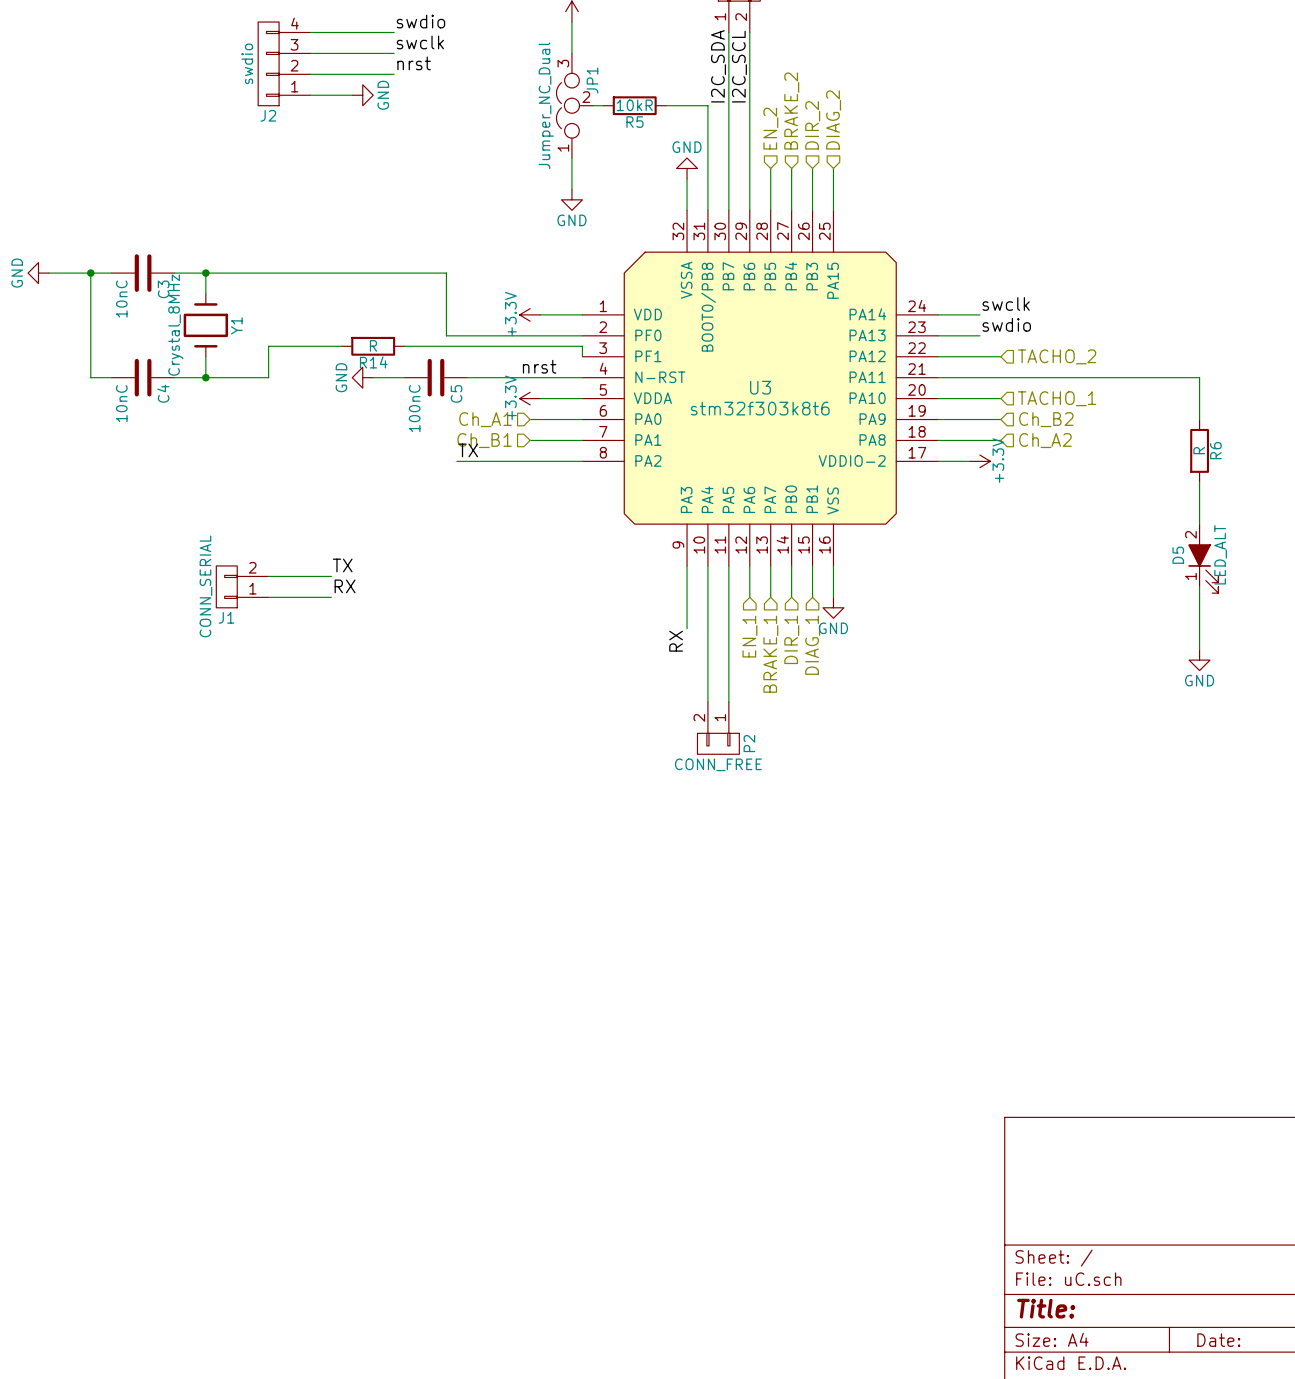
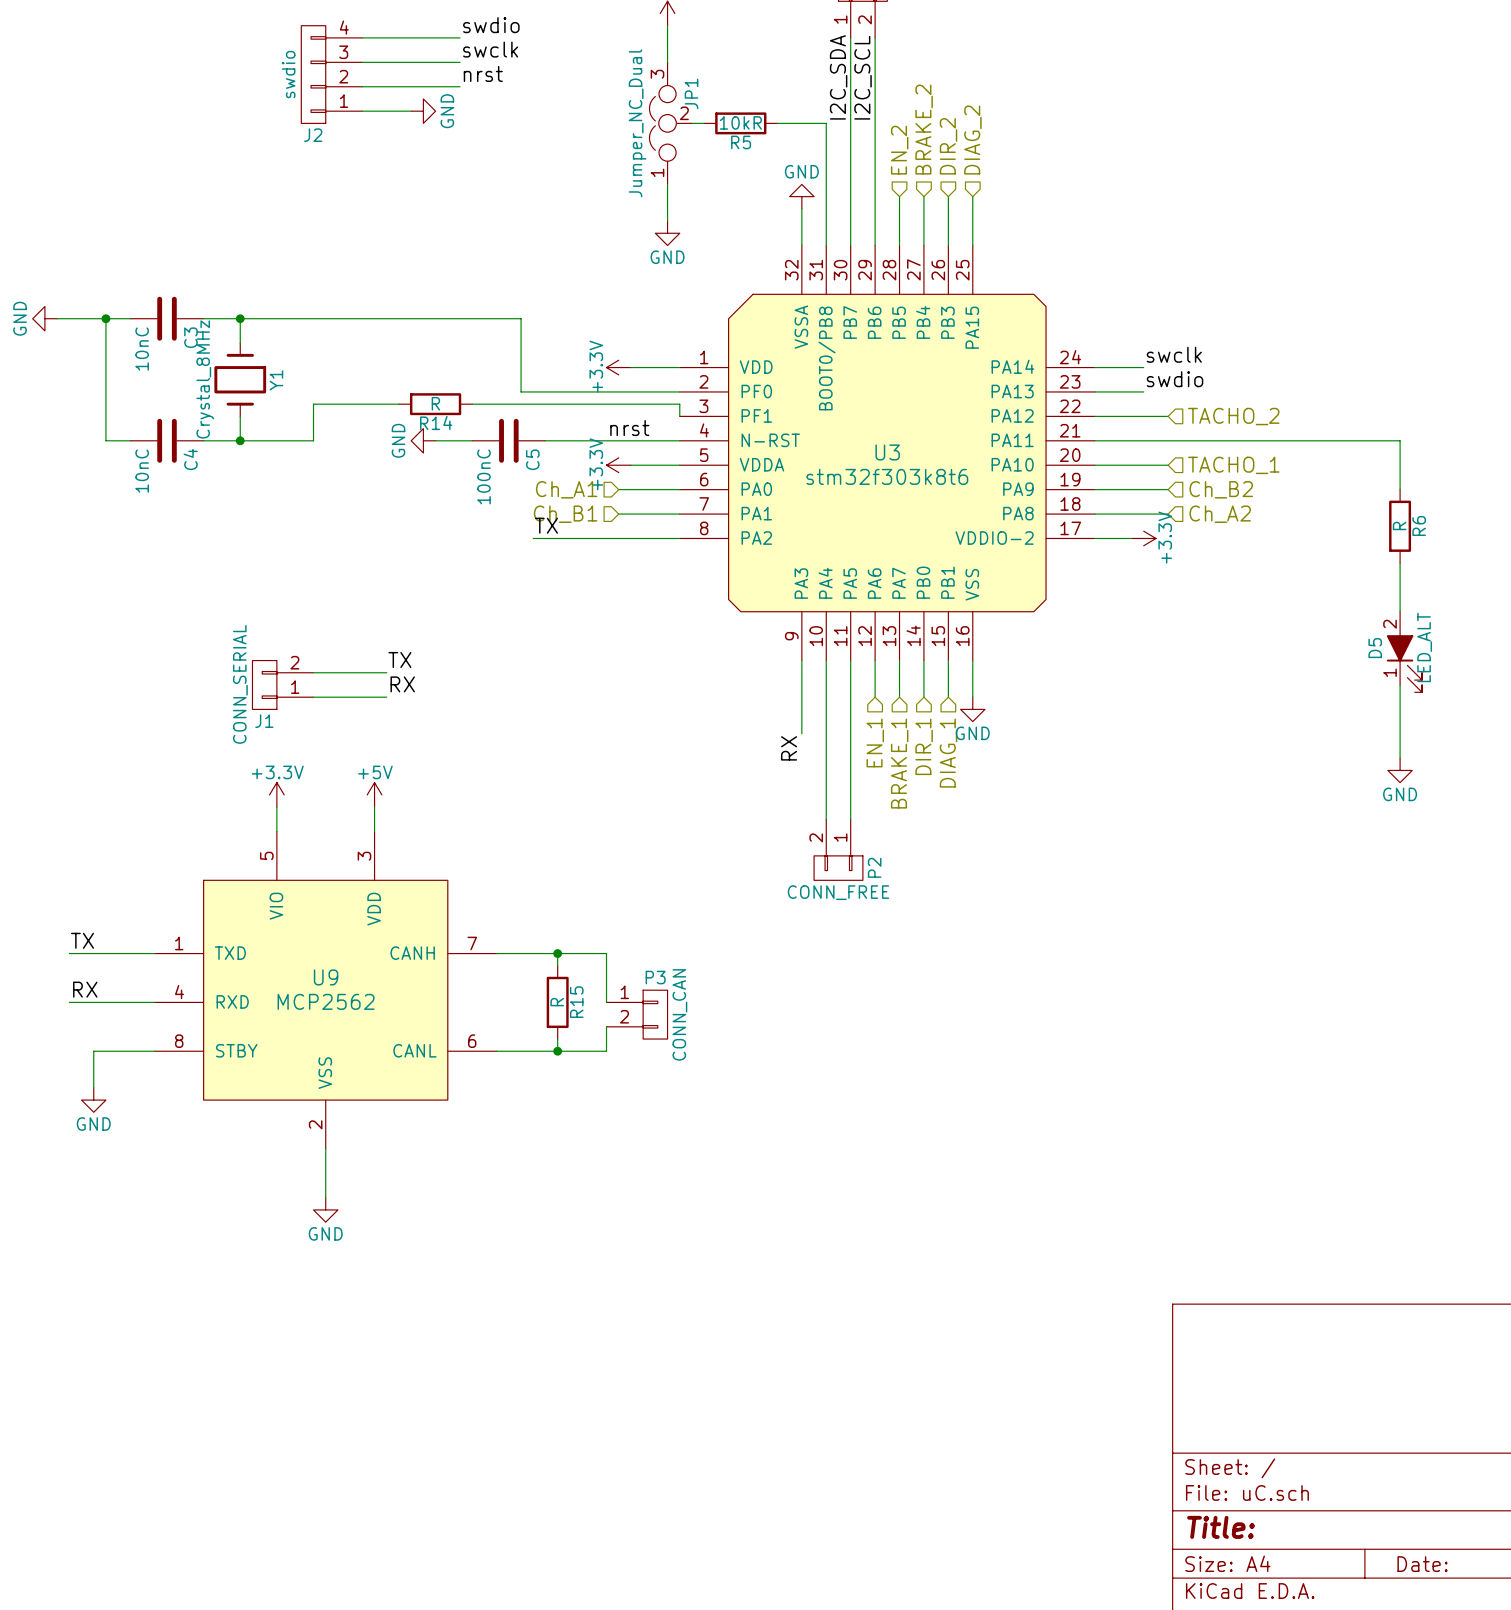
power symbol: none -> +3.3V (276, 794)
power symbol: none -> +5V (374, 794)
wire: none -> (276, 807) (276, 831)
wire: none -> (374, 807) (374, 831)
label: none -> TX (82, 940)
wire: none -> (69, 953) (154, 953)
wire: none -> (496, 953) (606, 953) (606, 1002)
wire: none -> (557, 953) (557, 965)
junction: none -> (557, 953)
label: none -> RX (85, 989)
U9: none -> MCP2562 (325, 990)
wire: none -> (69, 1002) (154, 1002)
R15: none -> R (557, 1002)
P3: none -> CONN_CAN (637, 1014)
wire: none -> (606, 1026) (606, 1051) (496, 1051)
wire: none -> (557, 1039) (557, 1051)
wire: none -> (154, 1051) (93, 1051) (93, 1087)
junction: none -> (557, 1051)
power symbol: none -> GND (93, 1100)
wire: none -> (325, 1148) (325, 1197)
power symbol: none -> GND (325, 1209)

